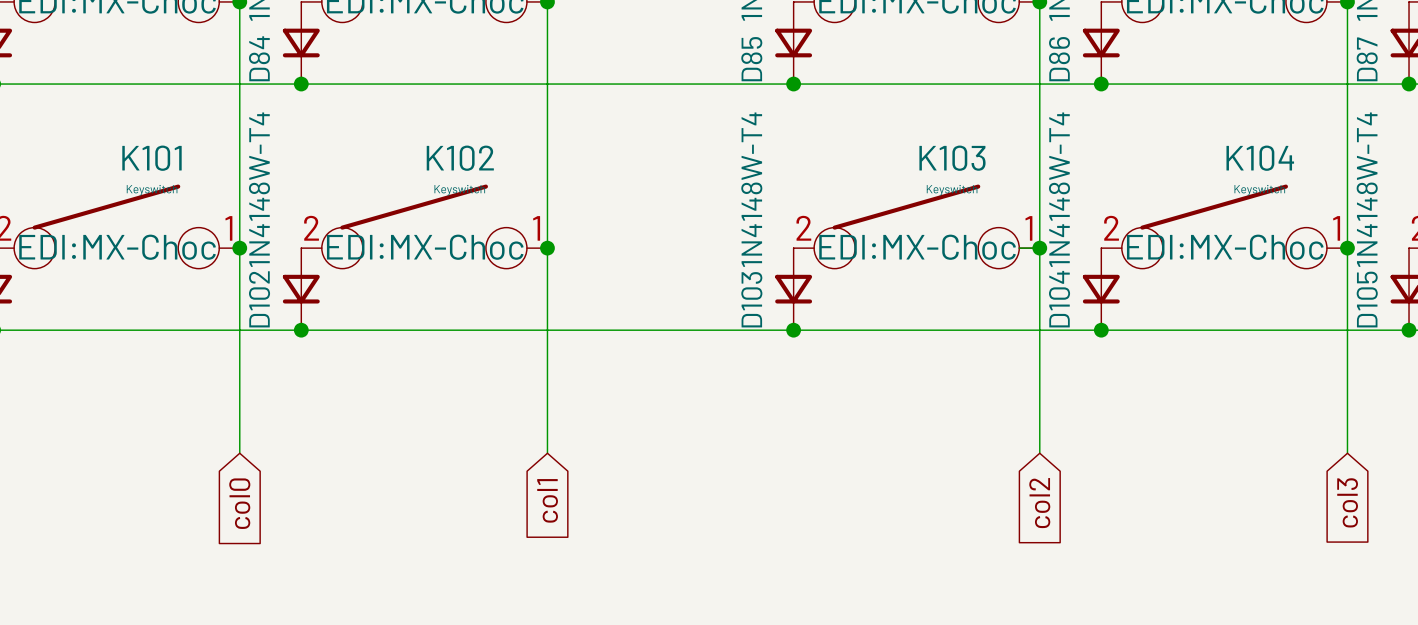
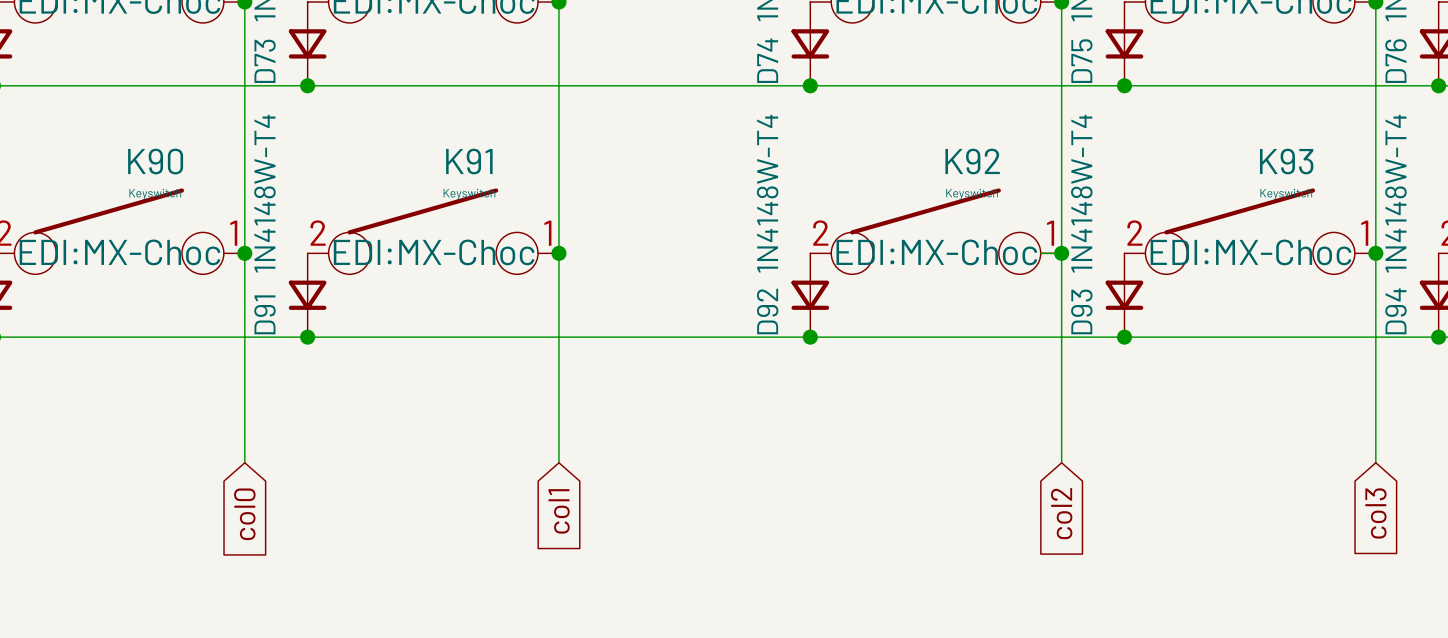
D84 name: D84 (259, 58) -> D73 (265, 61)
D85 name: D85 (751, 59) -> D74 (767, 60)
D86 name: D86 (1059, 59) -> D75 (1081, 61)
D87 name: D87 (1367, 59) -> D76 (1395, 61)
K101 name: K101 (151, 158) -> K90 (155, 161)
K102 name: K102 (460, 158) -> K91 (469, 161)
K103 name: K103 (952, 158) -> K92 (972, 161)
K104 name: K104 (1260, 158) -> K93 (1286, 161)
D102 name: D102 (259, 299) -> D91 (264, 314)
D103 name: D103 (751, 299) -> D92 (767, 311)
D104 name: D104 (1059, 299) -> D93 (1081, 311)
D105 name: D105 (1367, 299) -> D94 (1395, 311)

